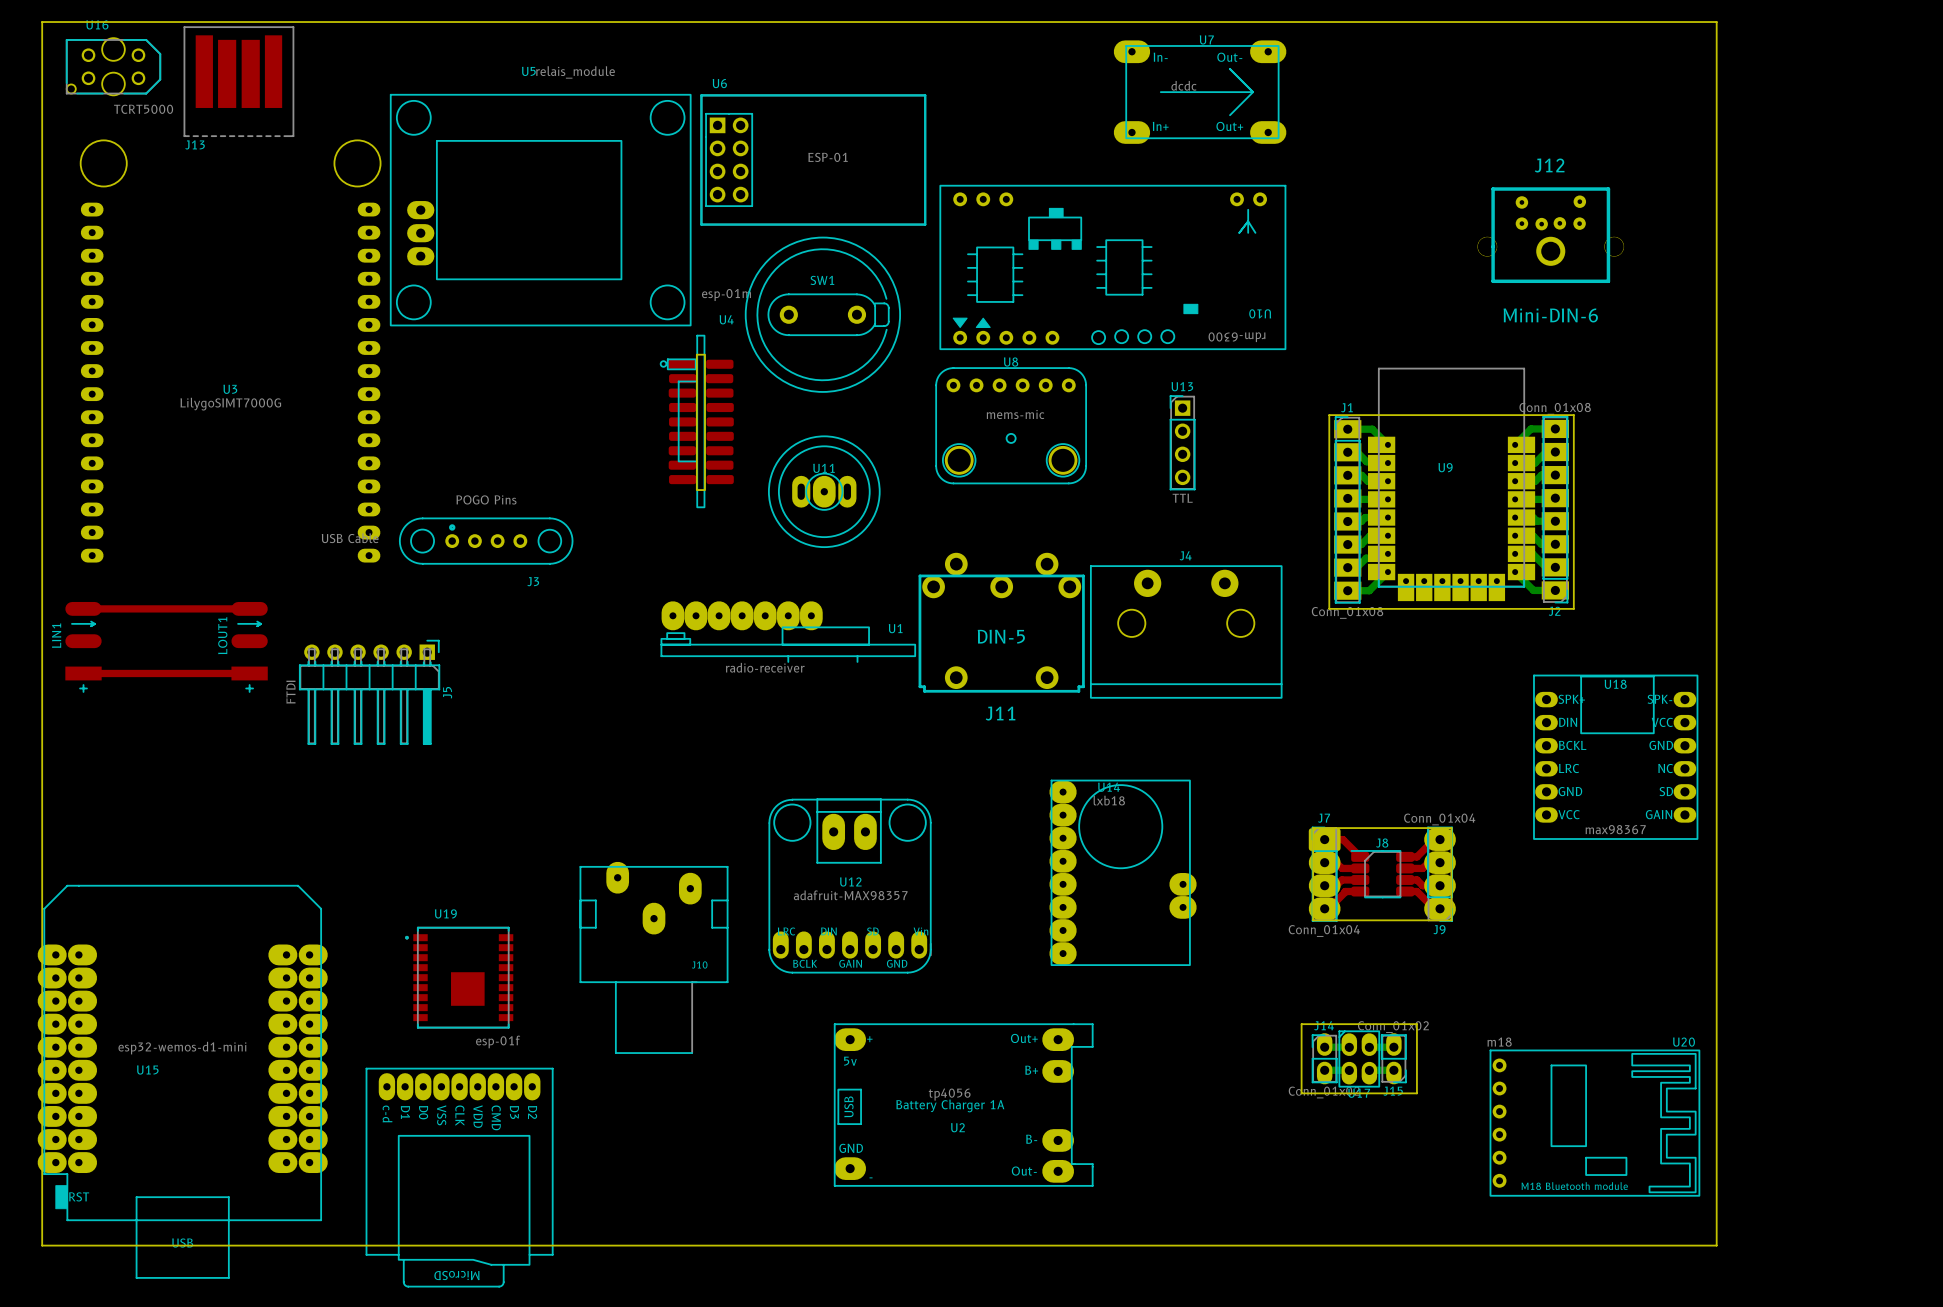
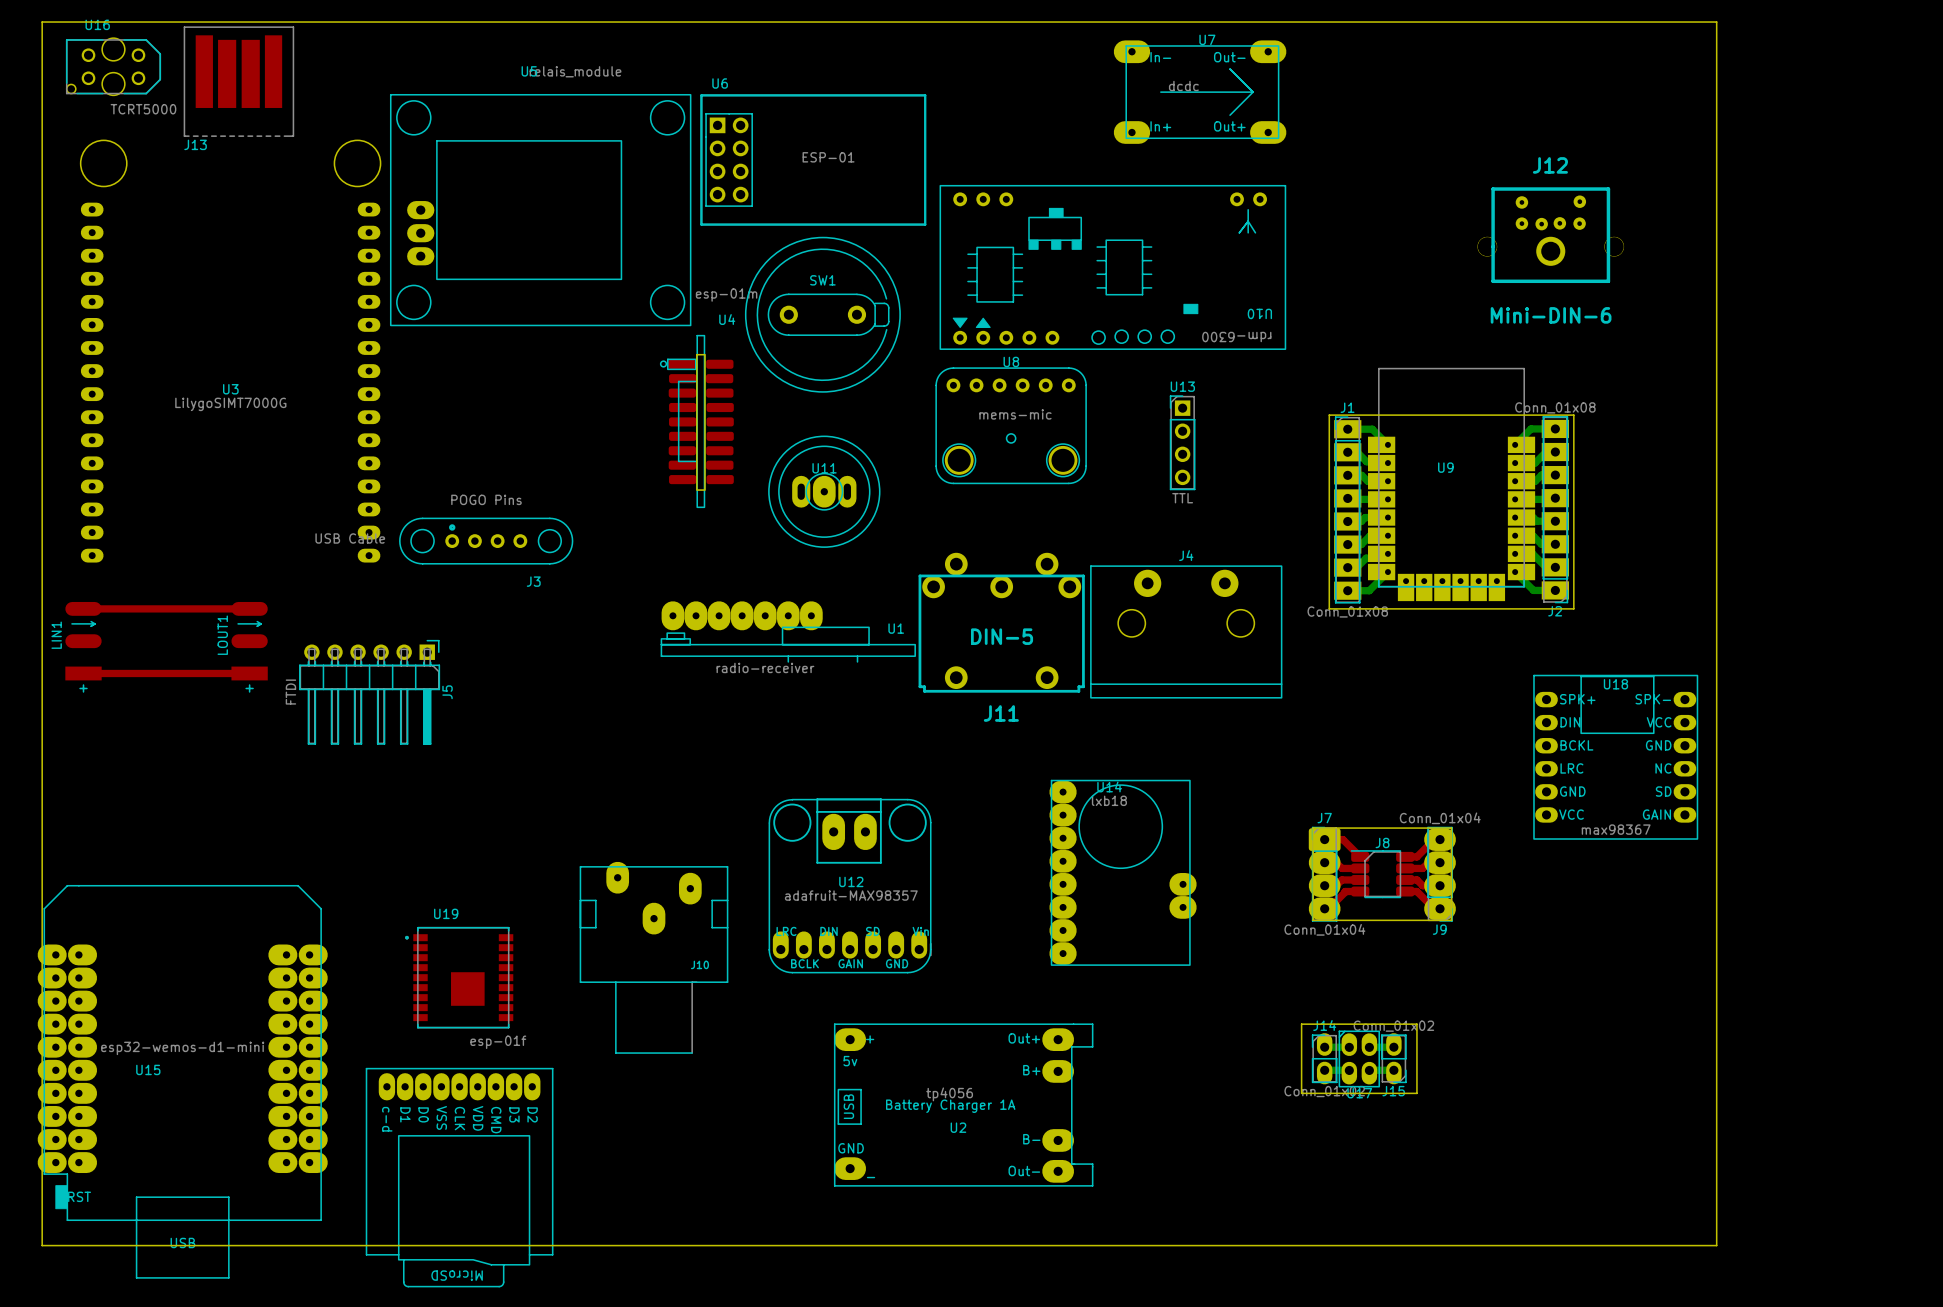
U20: m18 (1594, 1123) -> none

